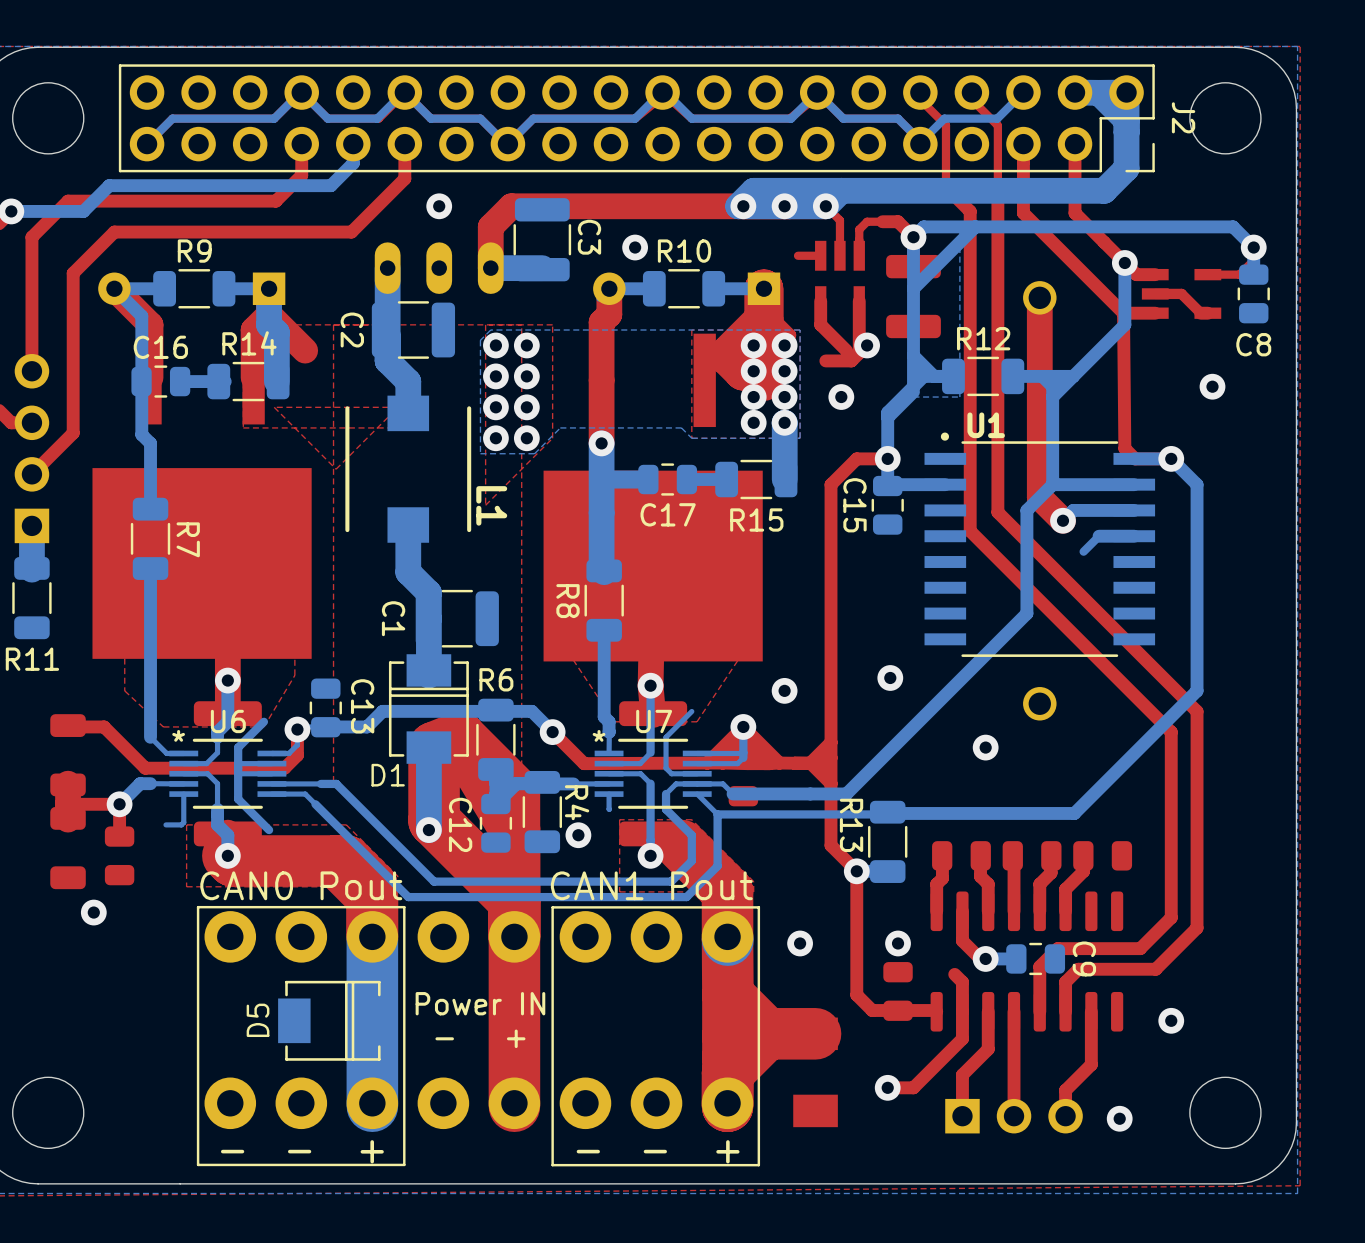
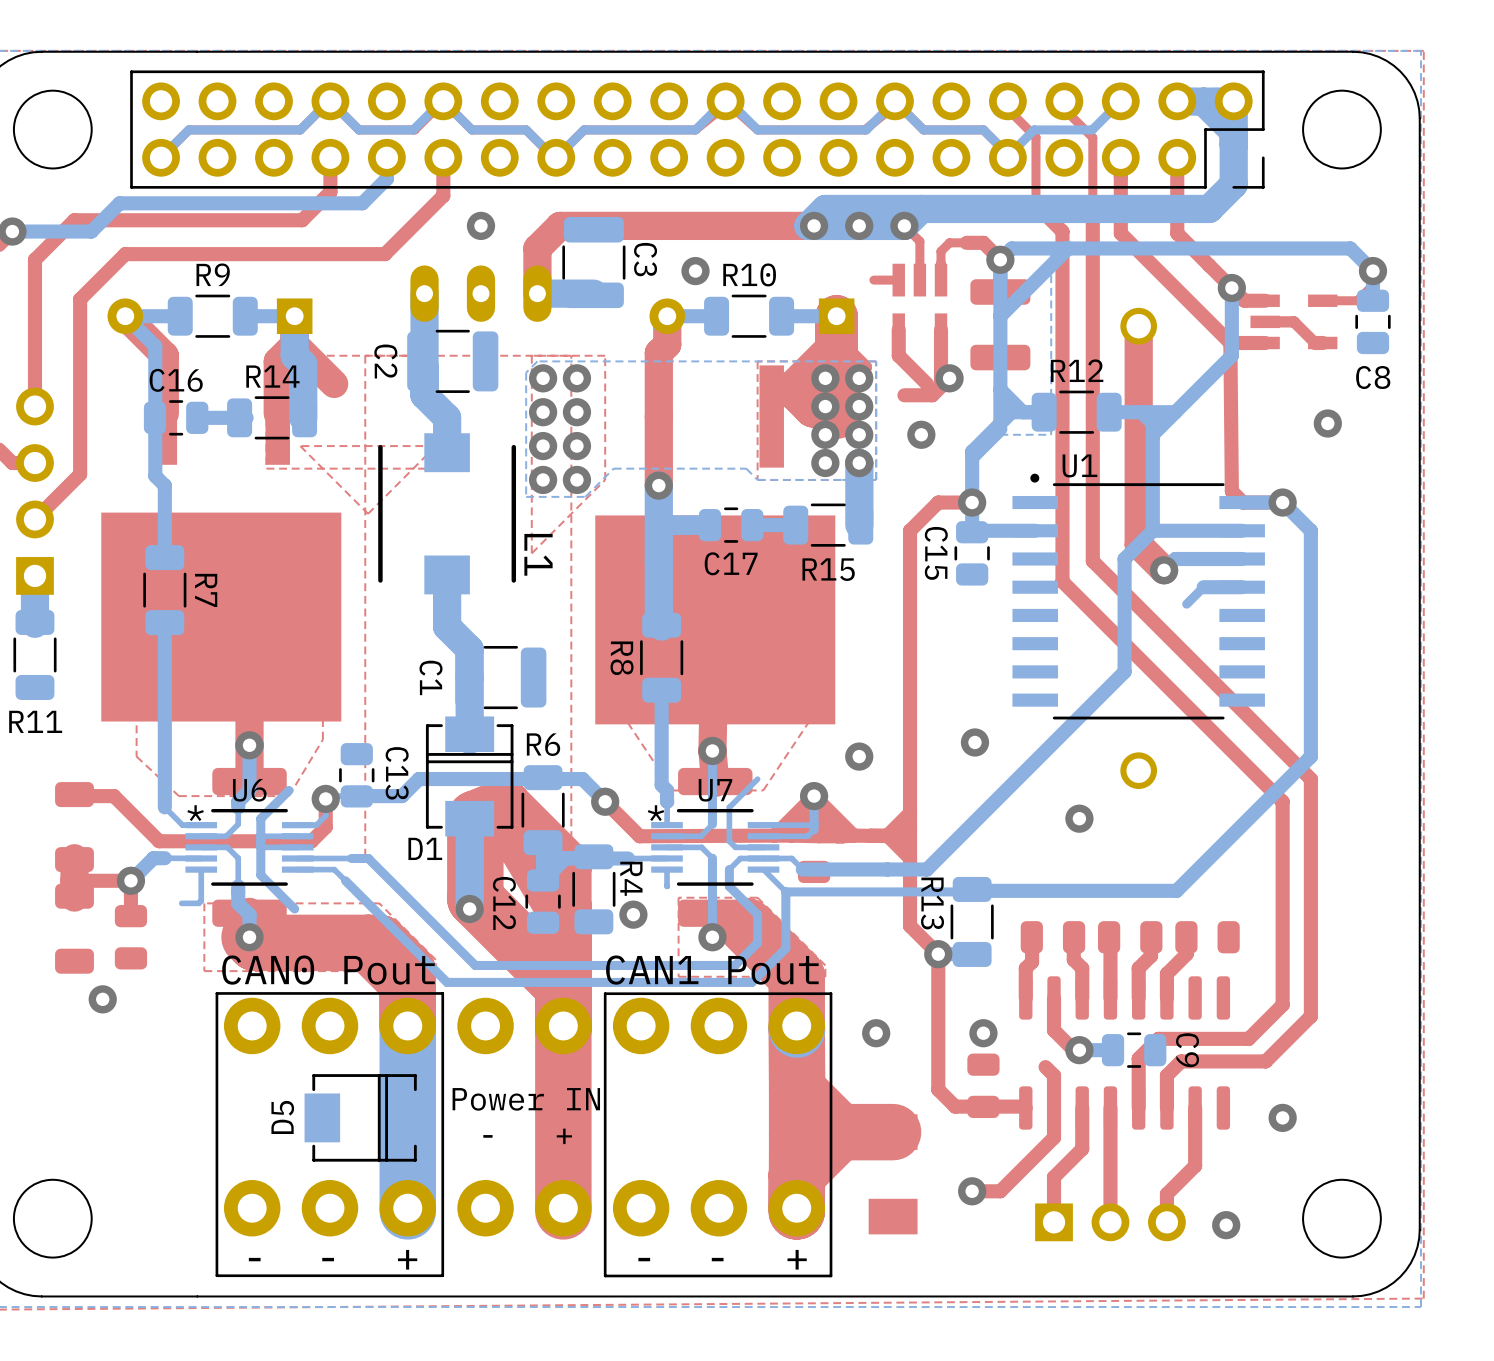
J2 name: J2 (1183, 117) -> none

